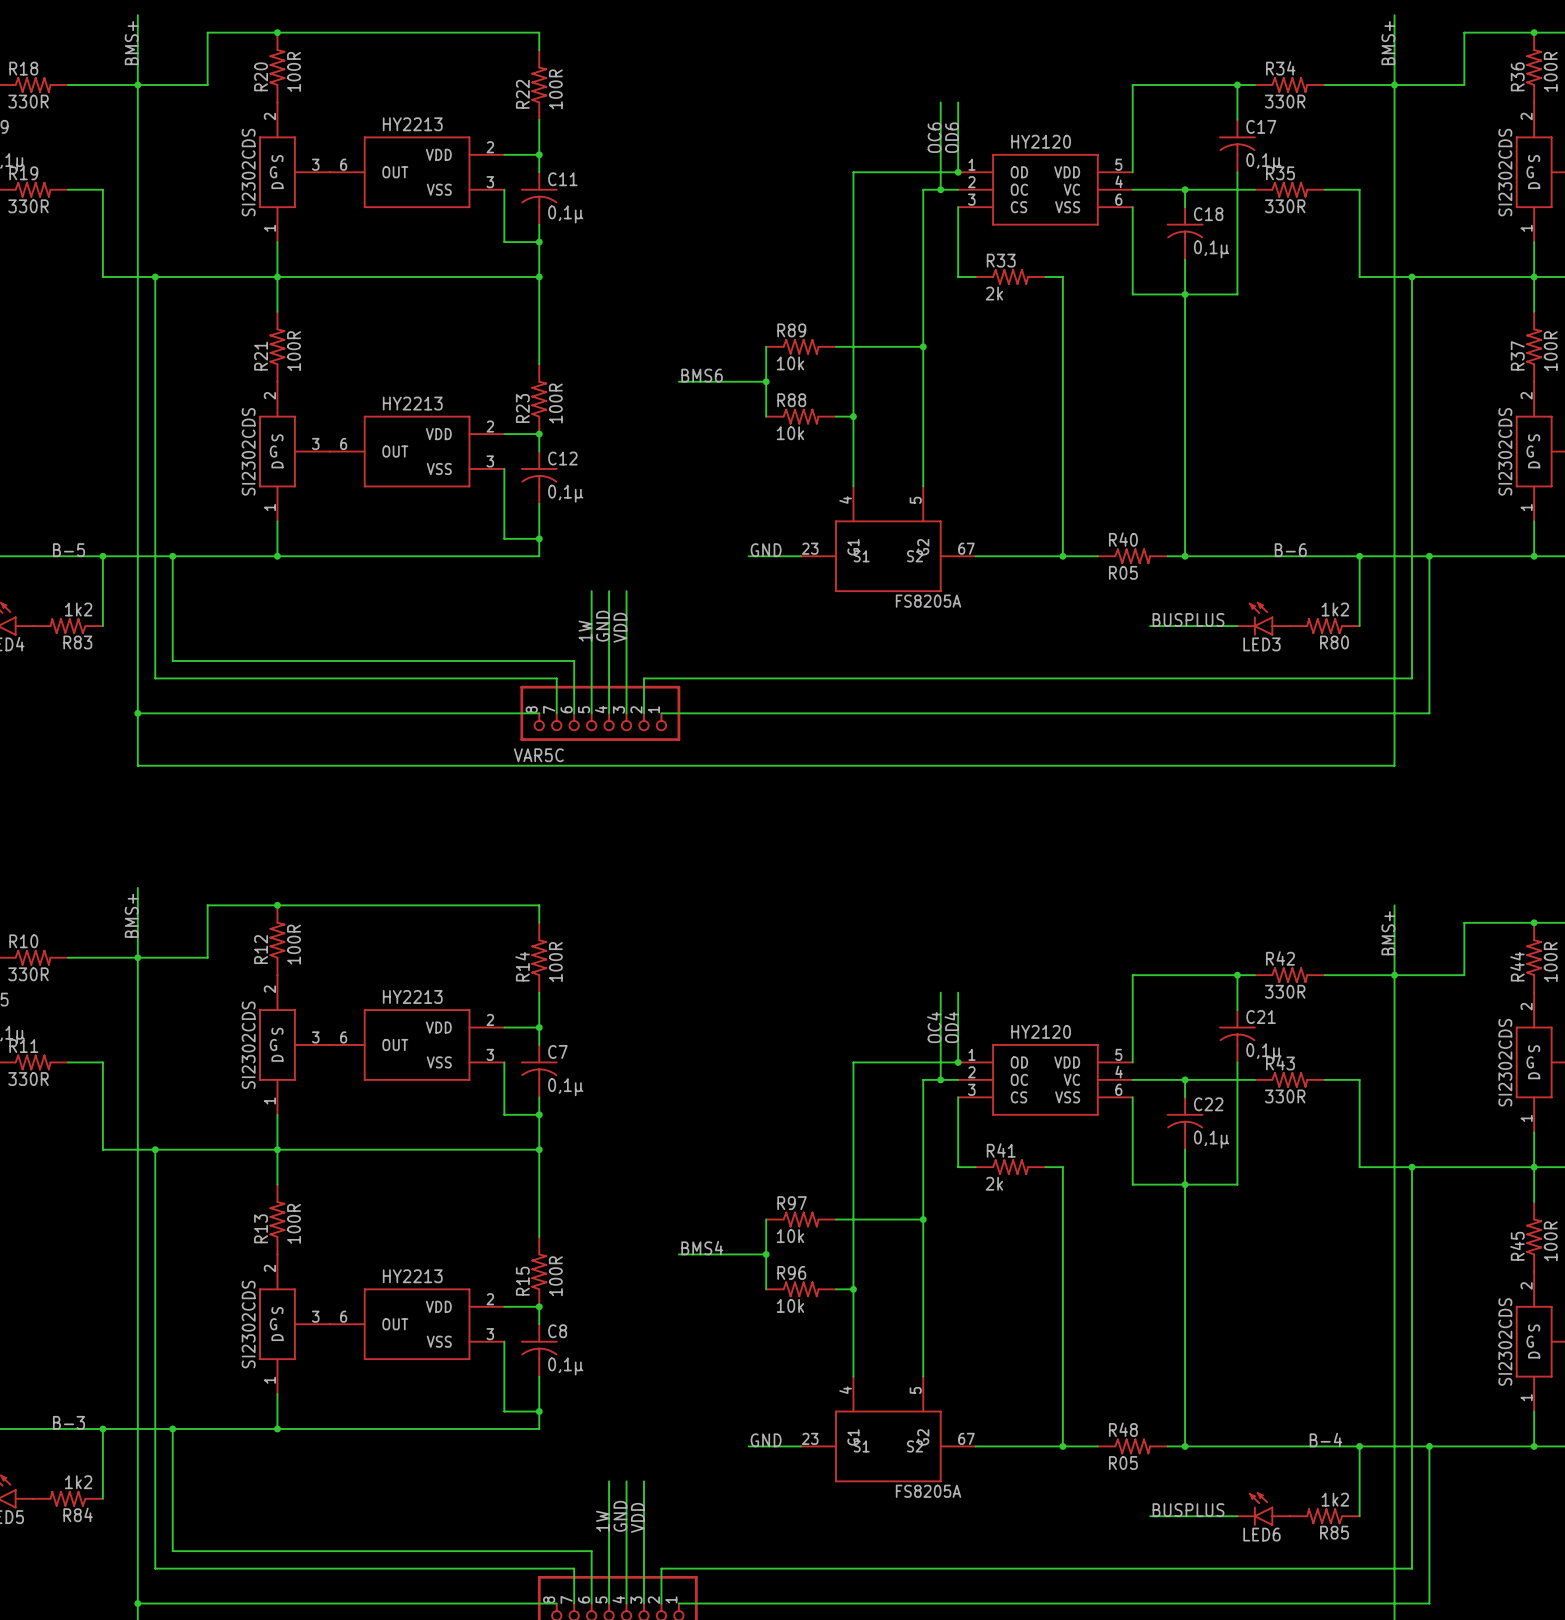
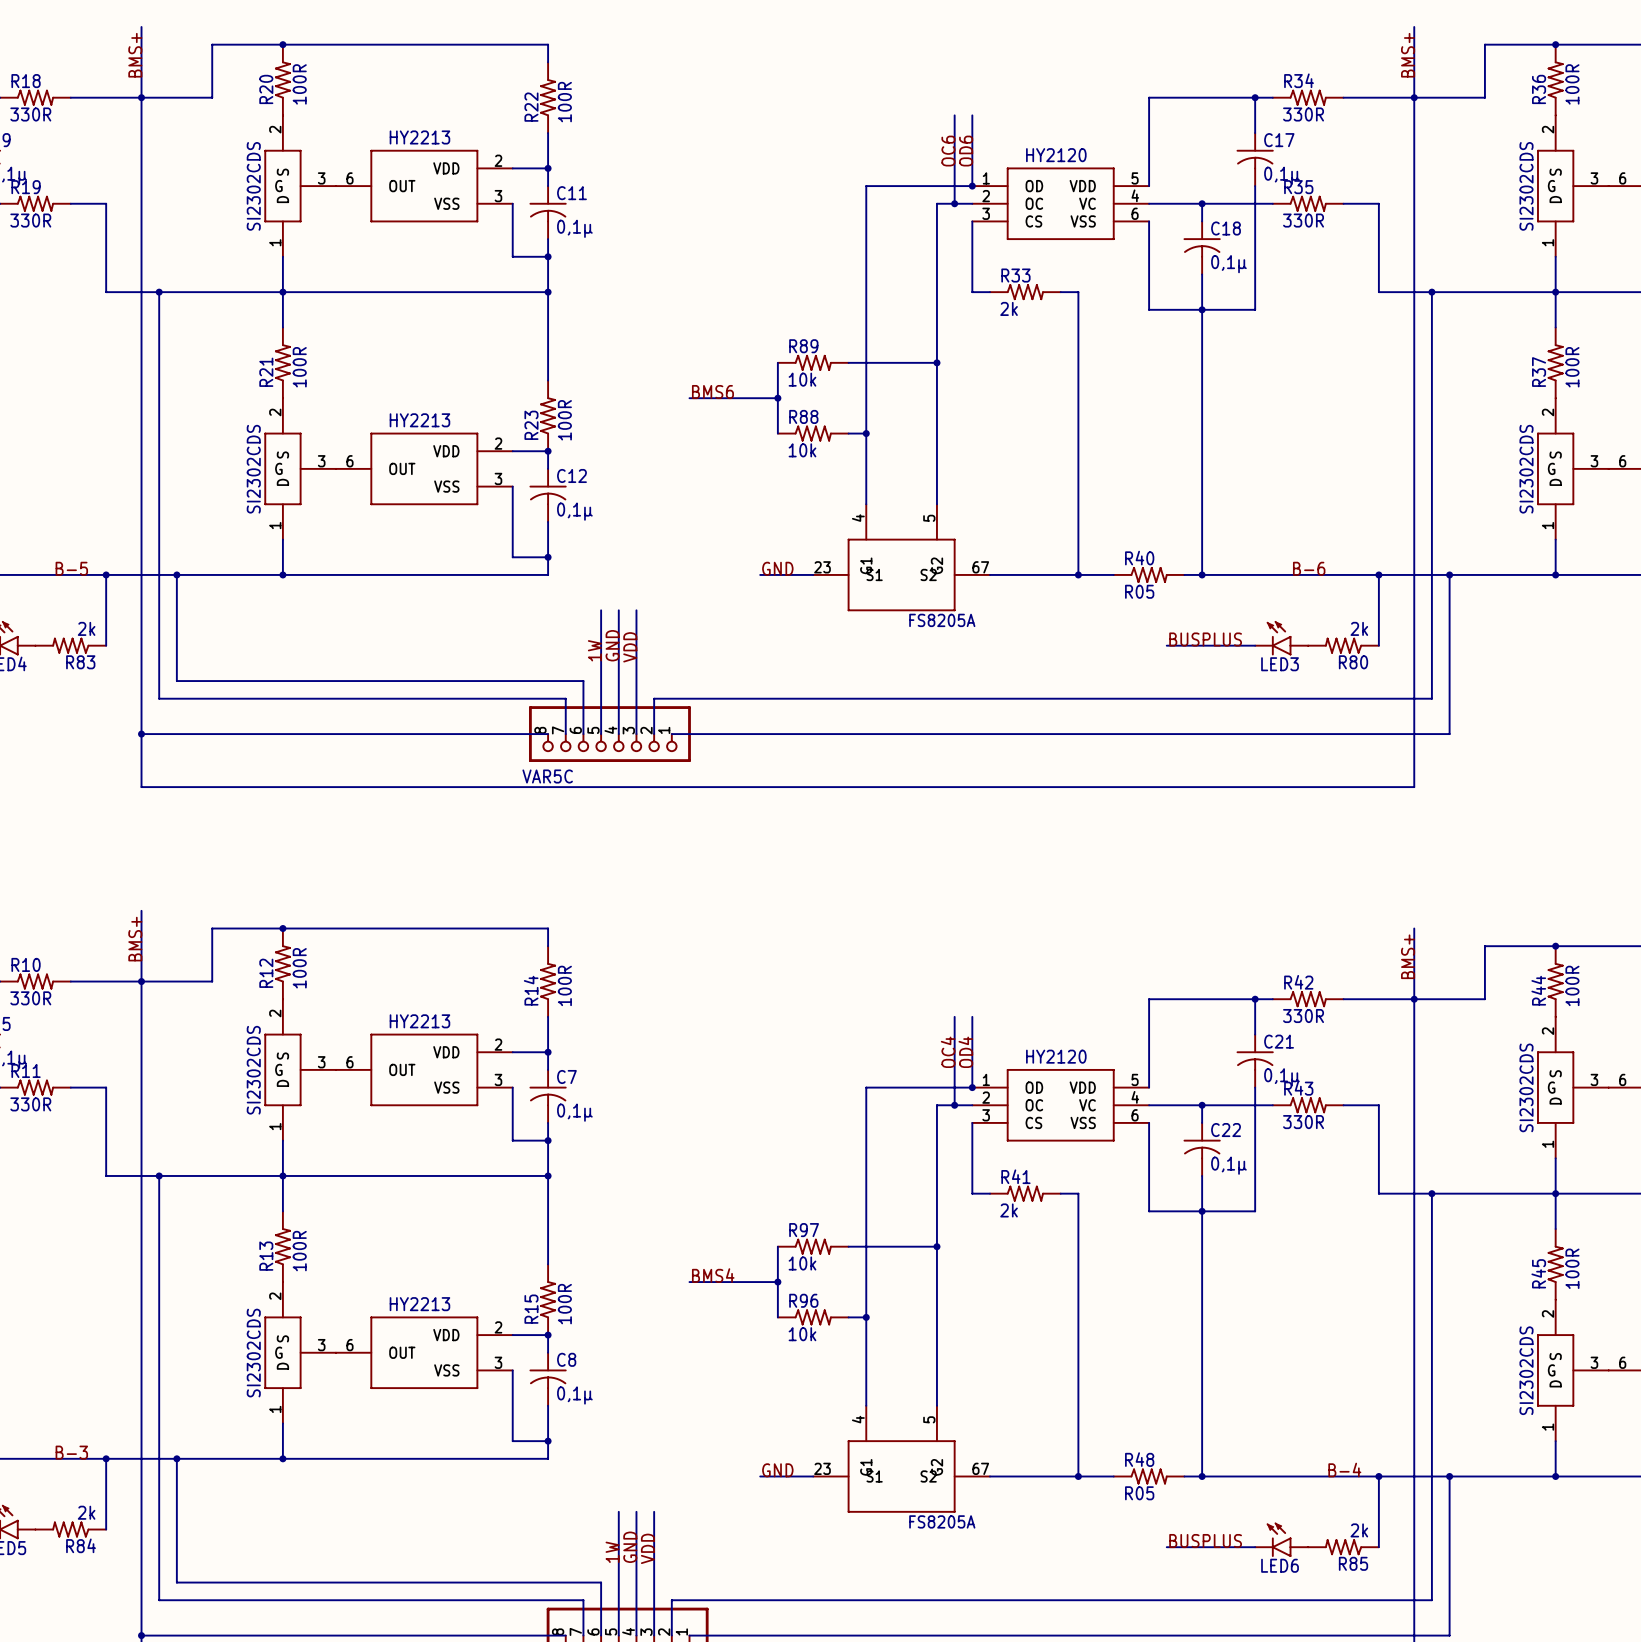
R83 value: 1k2 (78, 609) -> 2k (86, 628)
R80 value: 1k2 (1335, 609) -> 2k (1359, 628)
R84 value: 1k2 (78, 1482) -> 2k (86, 1512)
R85 value: 1k2 (1335, 1499) -> 2k (1359, 1530)

